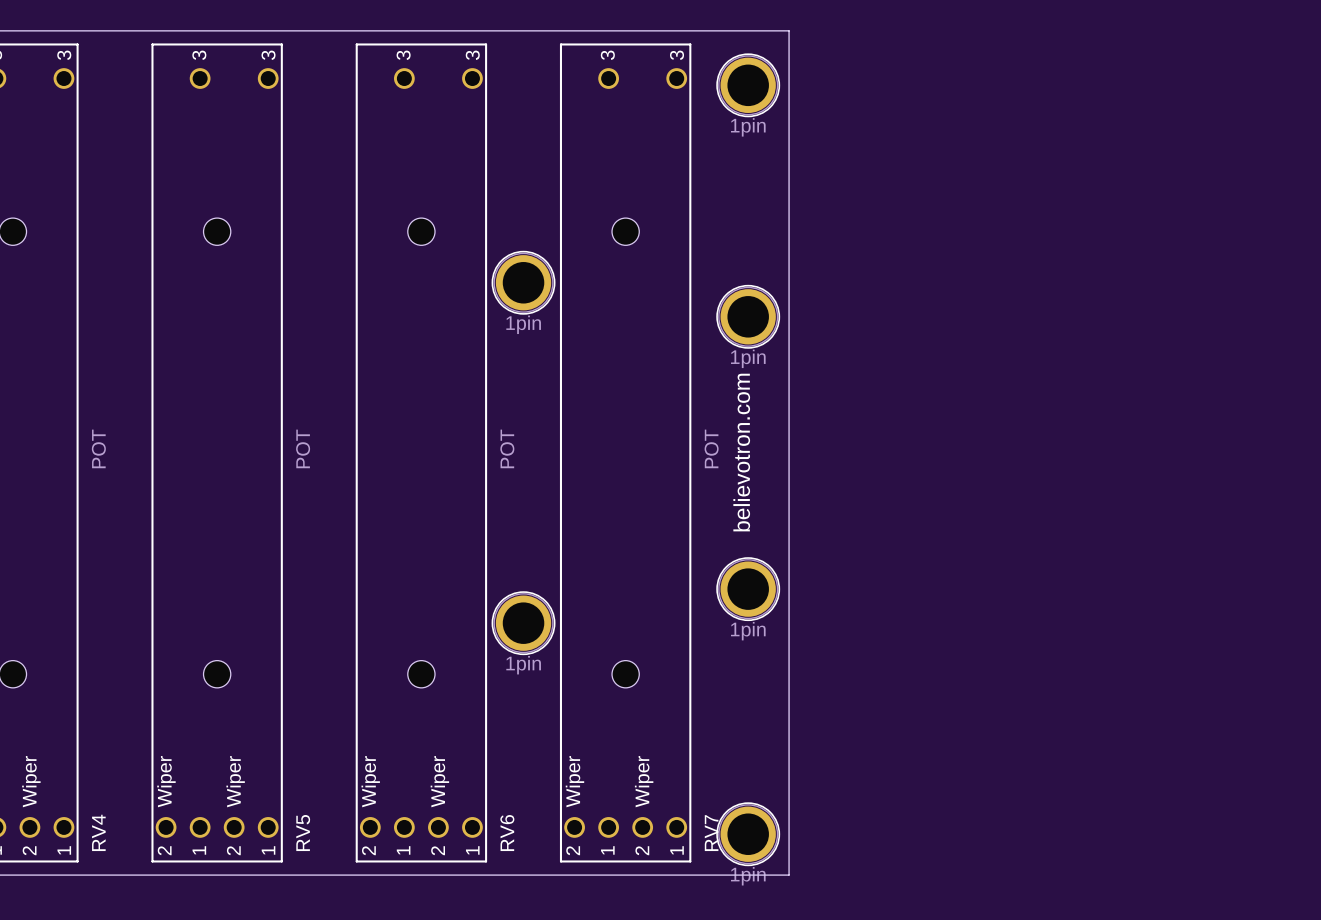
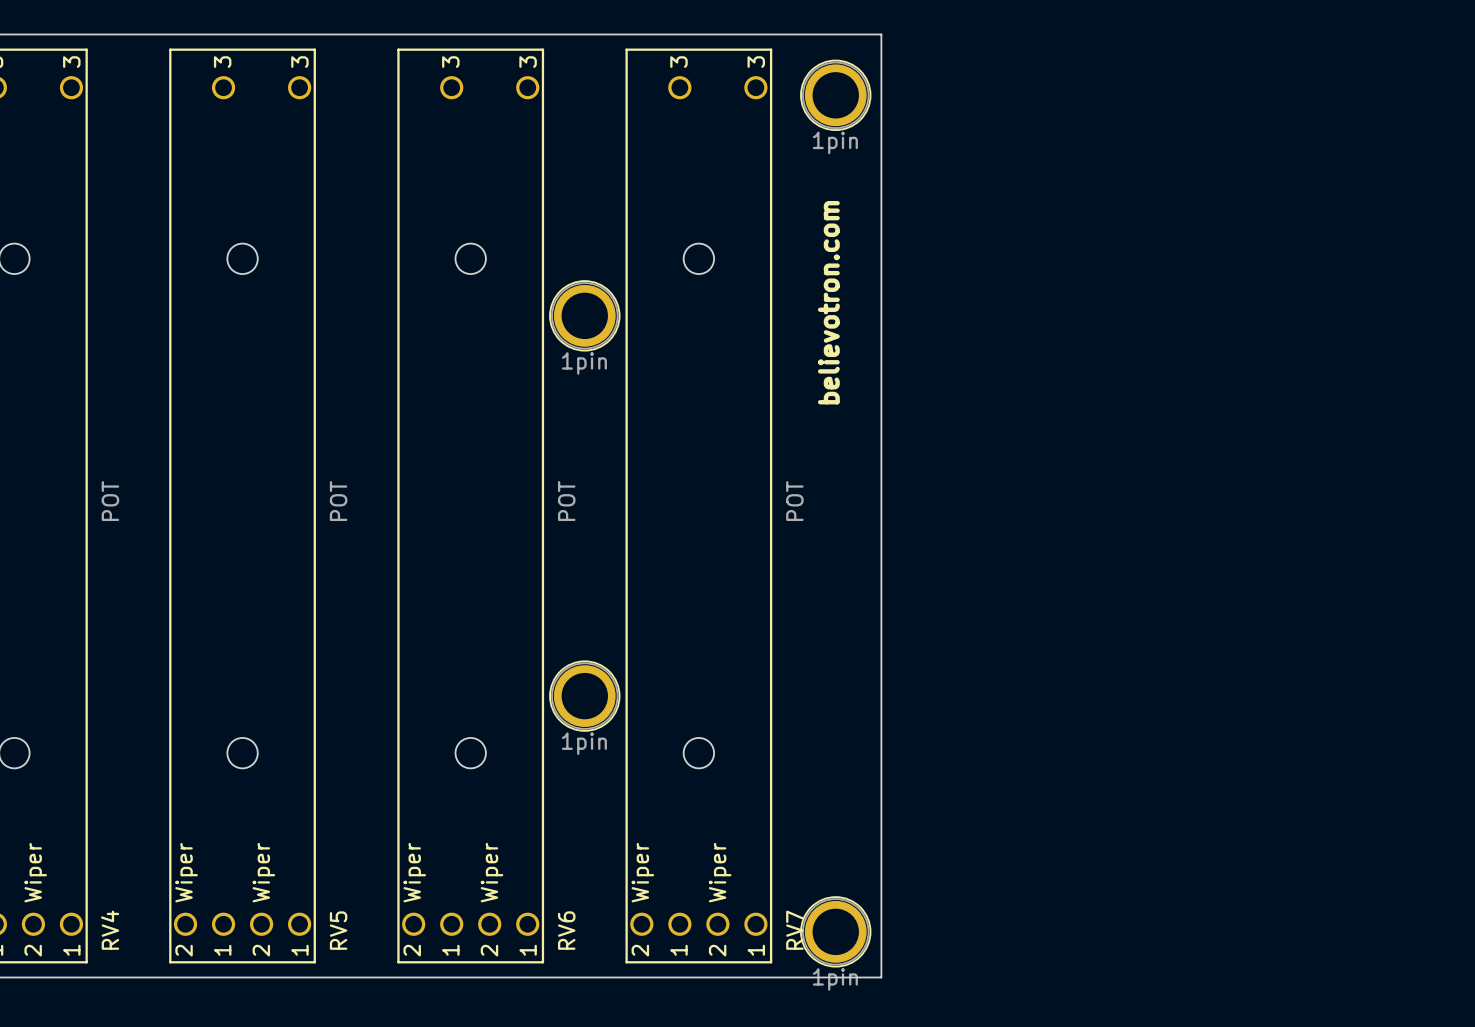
part: 1pin (748, 316) -> none
text position: believotron.com (741, 452) -> believotron.com (828, 302)
part: 1pin (748, 589) -> none

